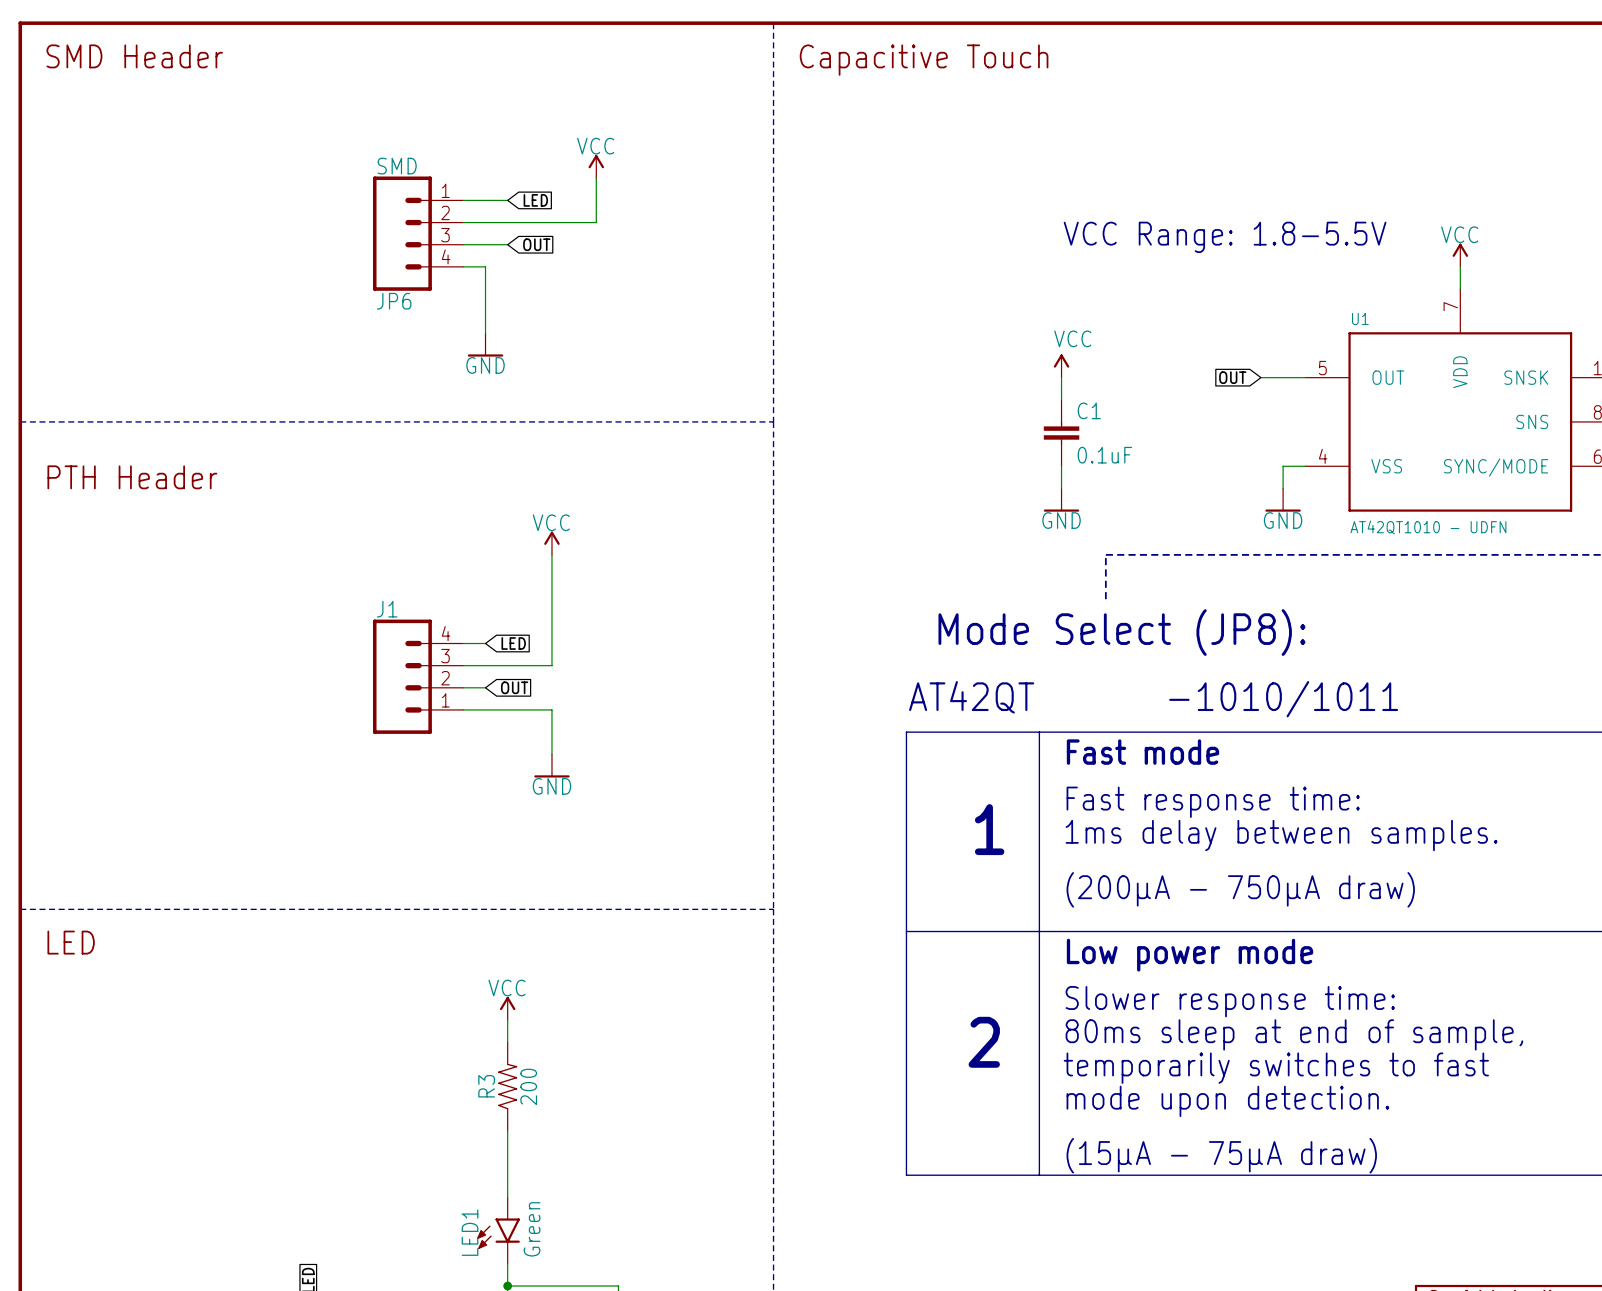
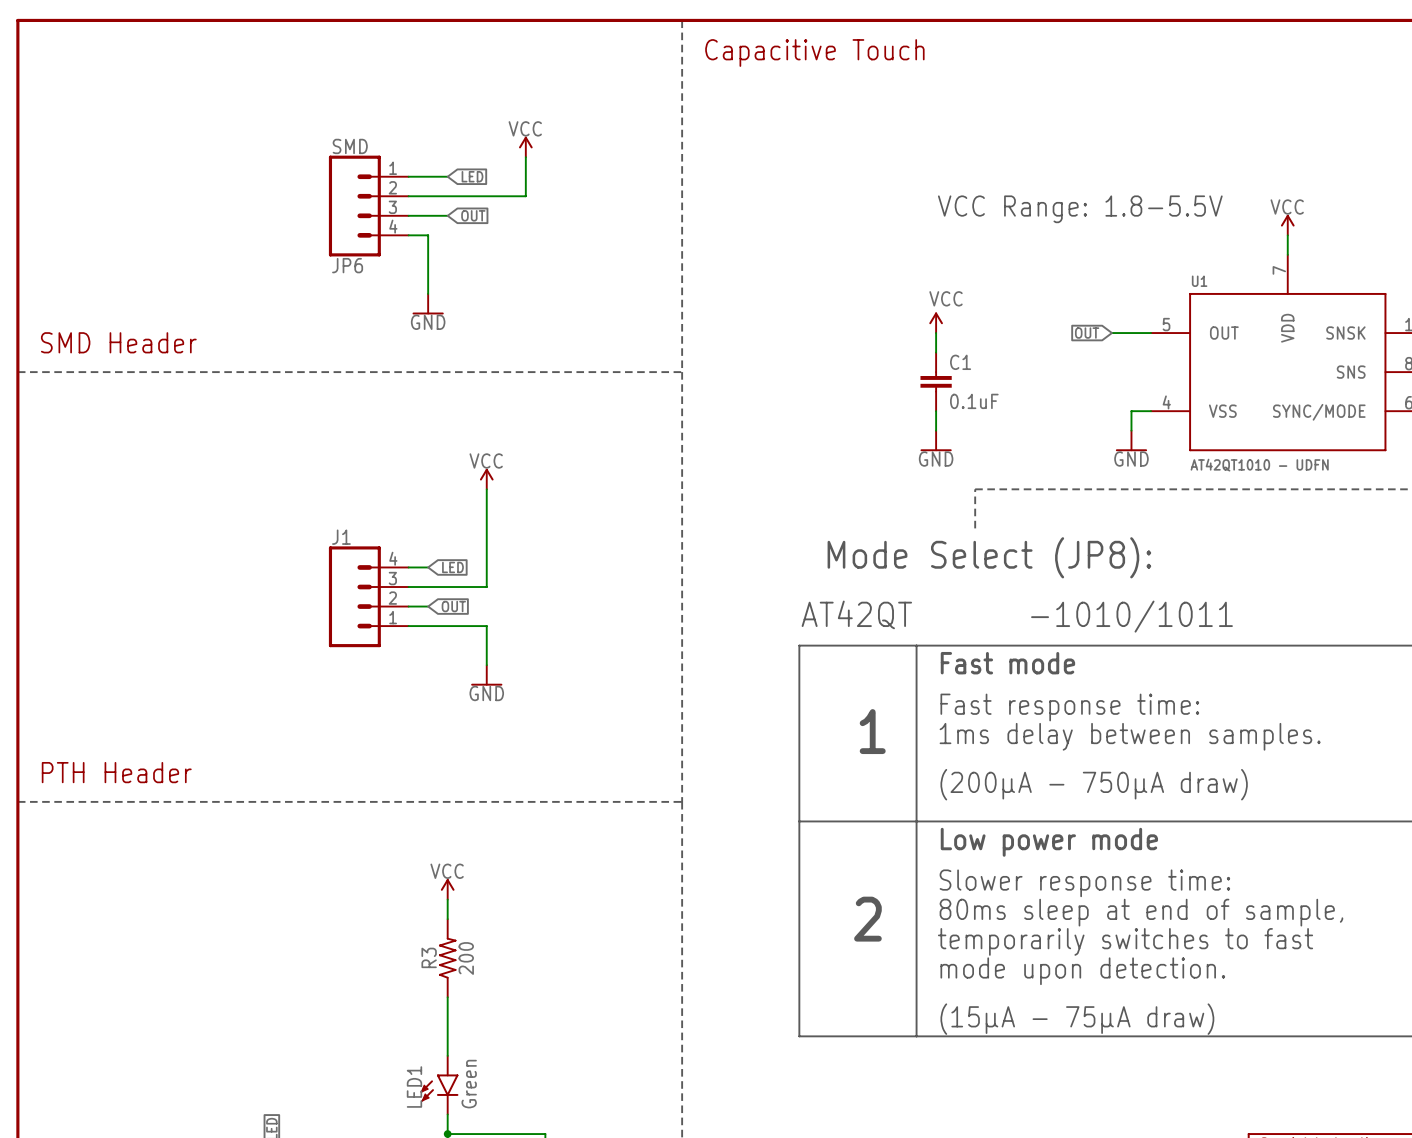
text: SMD Header (134, 56) -> none
text: none -> SMD Header (118, 342)
text: PTH Header (132, 477) -> none
text: none -> PTH Header (116, 772)
text: LED (71, 942) -> none

